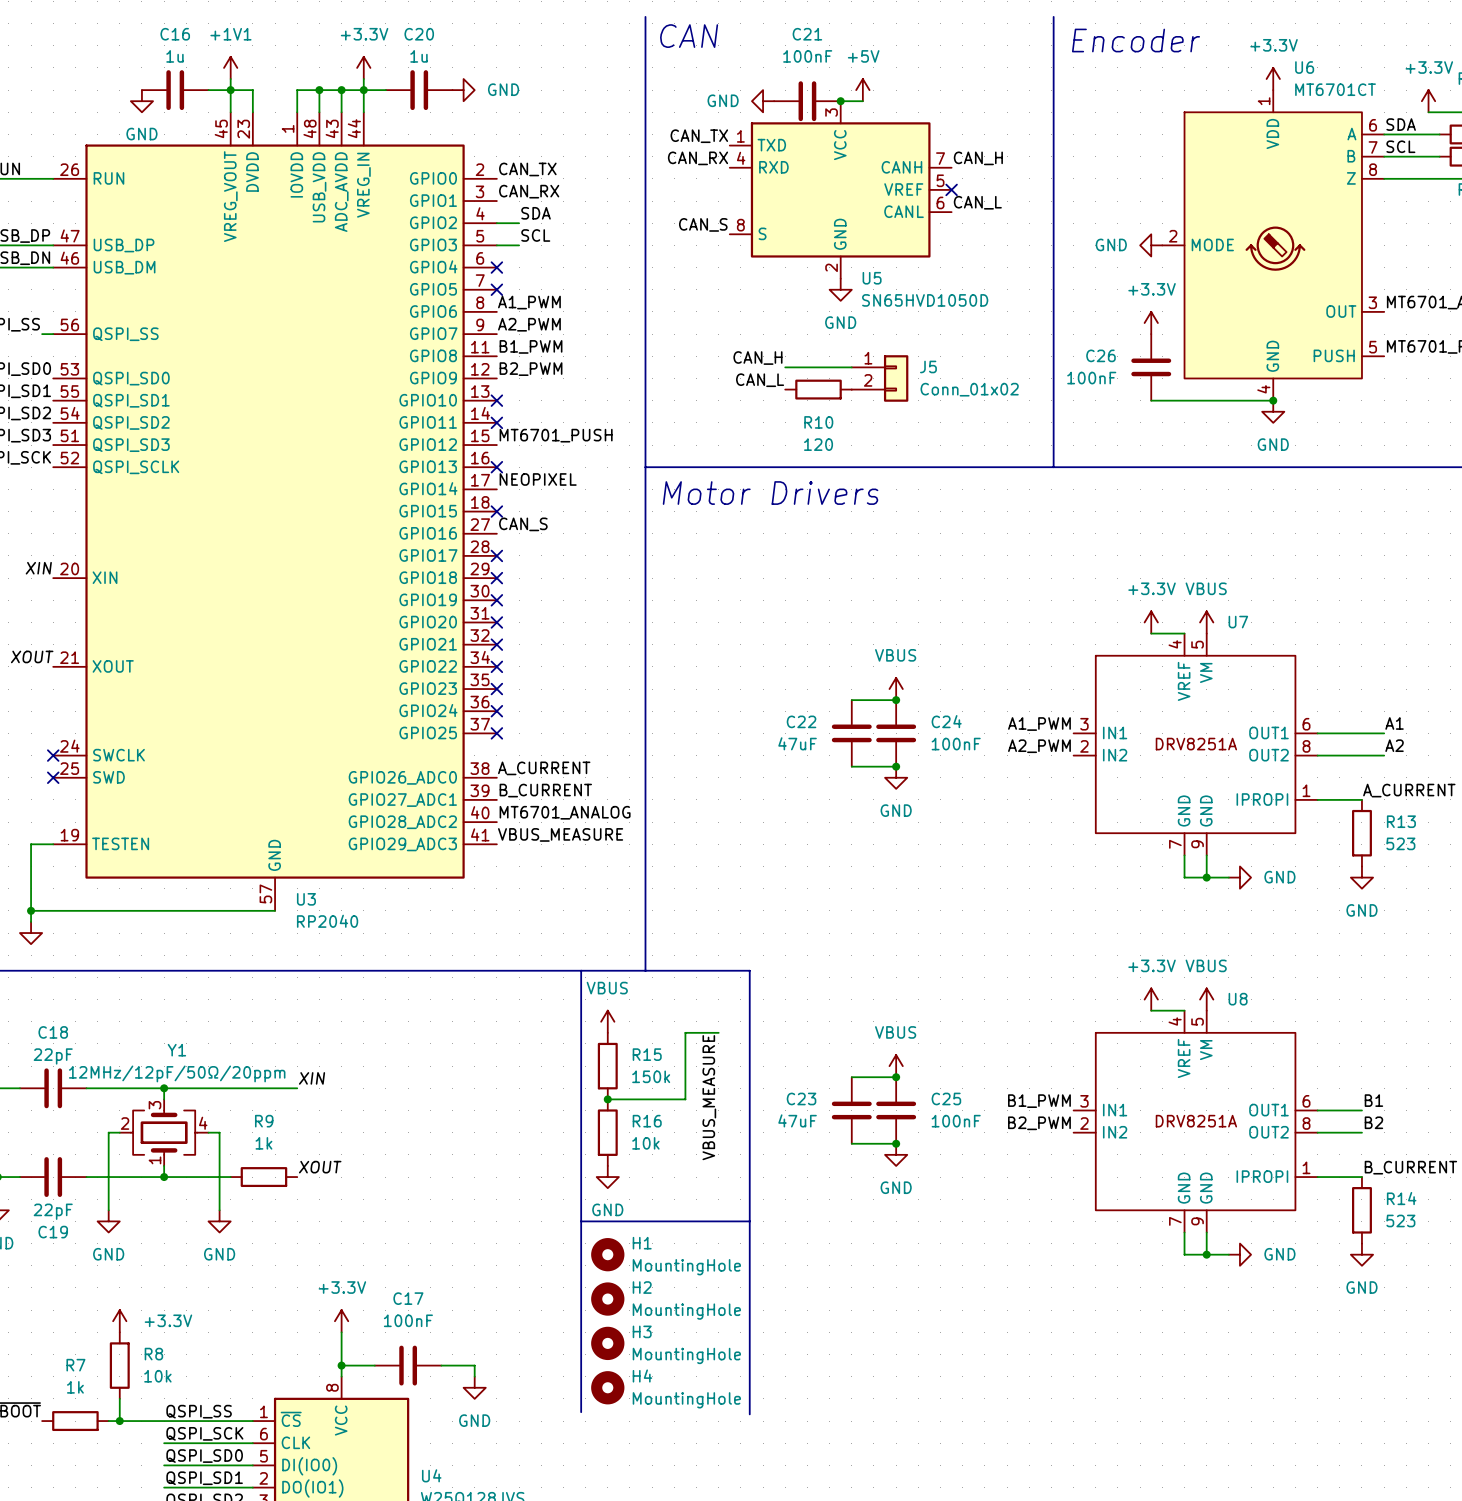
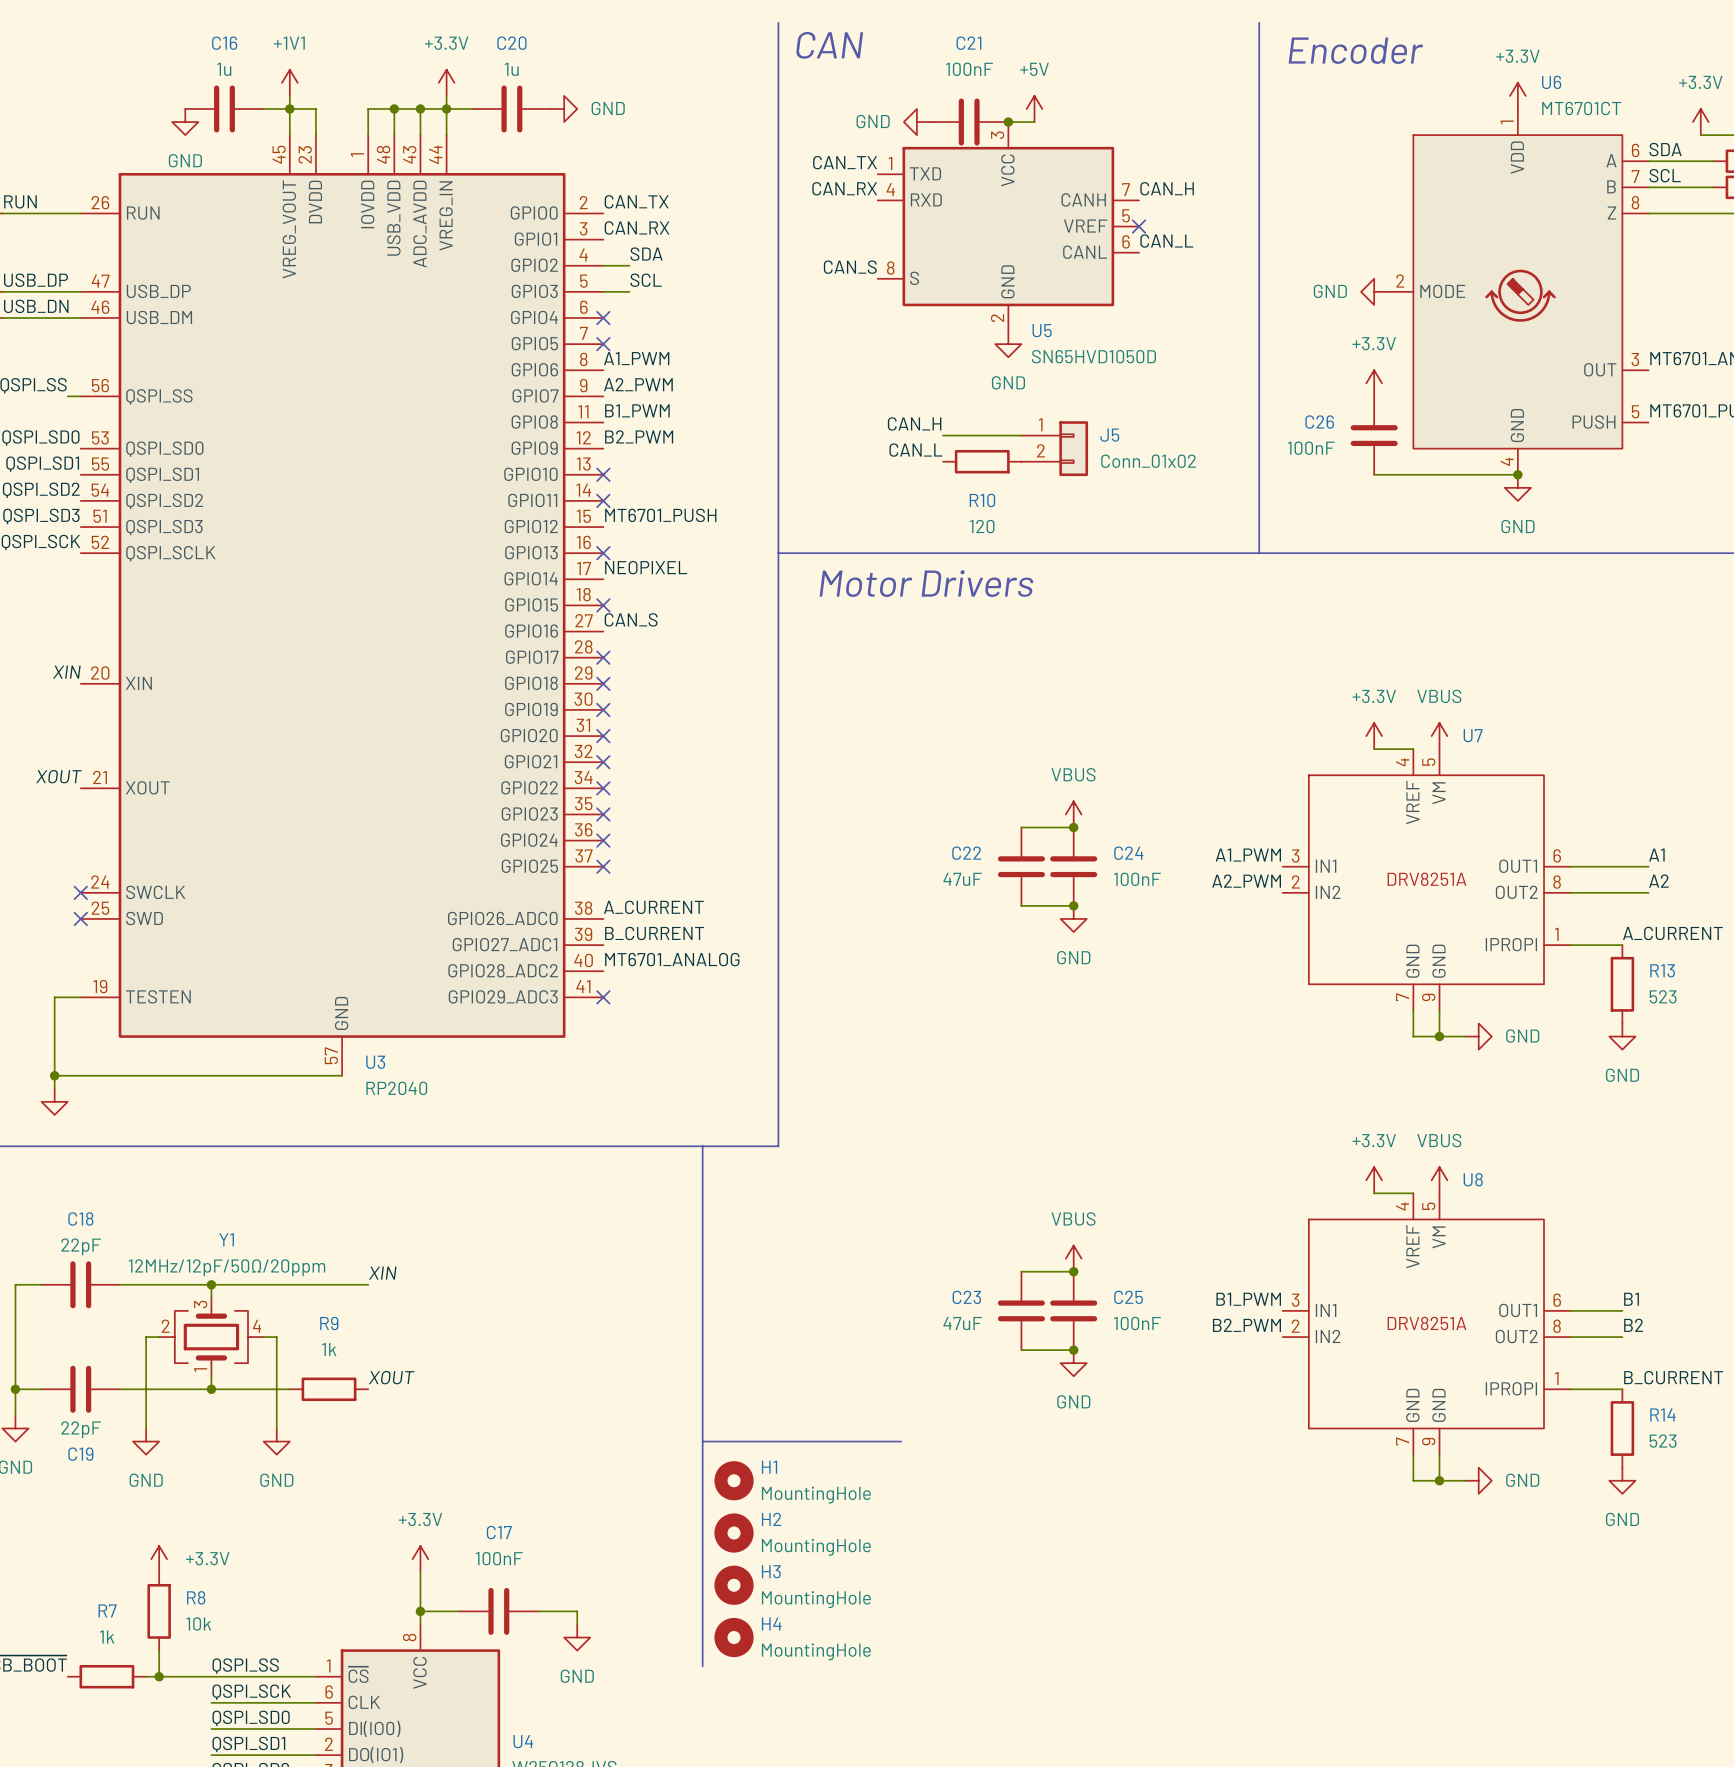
label: VBUS_MEASURE (560, 834) -> none
no-connect mark: none -> (603, 997)
line: (645, 970) (749, 970) (749, 1414) -> none
power symbol: VBUS (607, 1021) -> none
wire: (718, 1032) (685, 1032) (685, 1099) (607, 1099) -> none
R15: 150k (607, 1066) -> none
label: VBUS_MEASURE (709, 1097) -> none
junction: (607, 1099) -> none
R16: 10k (607, 1132) -> none
power symbol: GND (607, 1177) -> none

